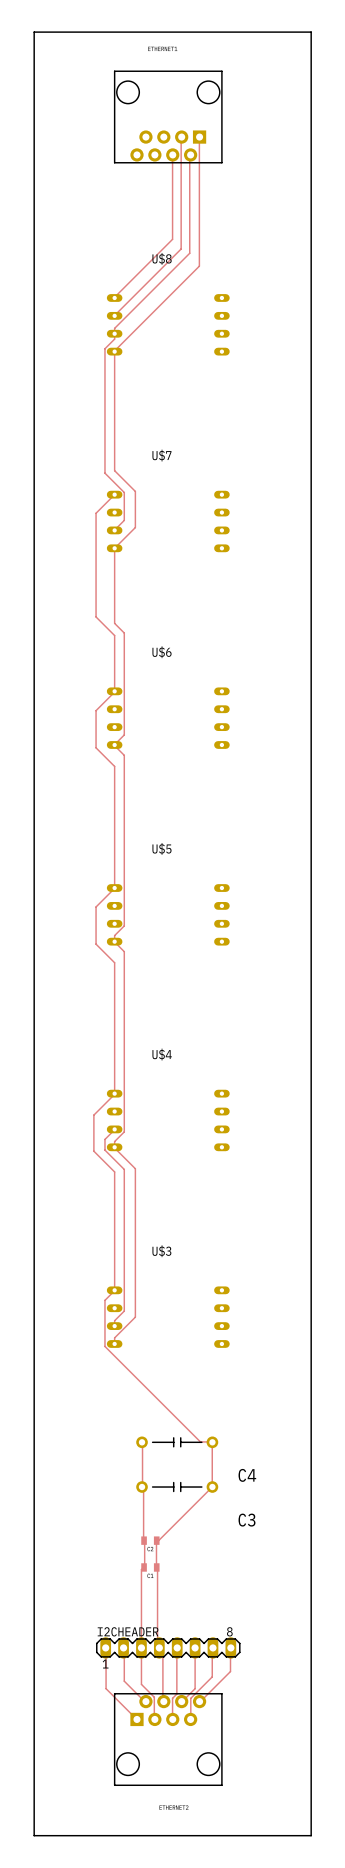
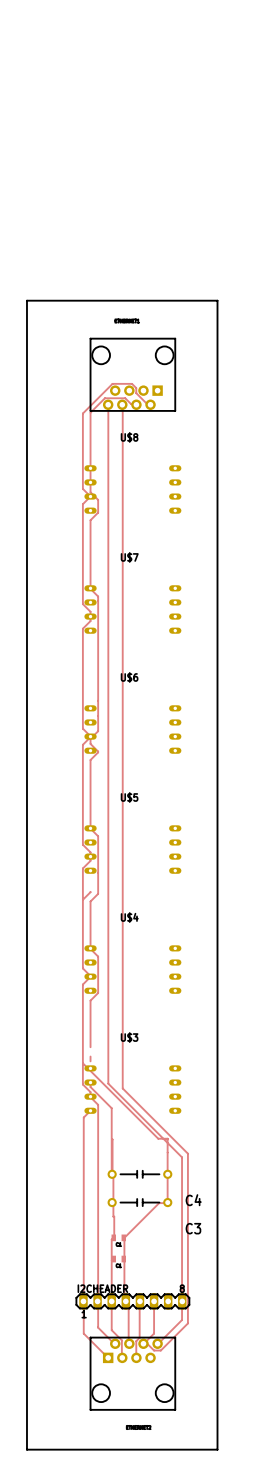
part position: (168, 117) -> (132, 374)
track: (181, 137) (181, 248) (114, 315) -> none
track: (199, 137) (199, 266) (114, 350) (114, 470) (135, 491) (135, 527) (114, 548) -> (90, 418) (90, 433)
track: (172, 154) (172, 239) (114, 297) -> none
track: (190, 154) (189, 253) (114, 328) (114, 339) (104, 348) (104, 473) (124, 492) (124, 520) (114, 530) -> (136, 404) (131, 404) (125, 398) (104, 398) (90, 412) (90, 418)
U$8 position: (168, 324) -> (132, 489)
board edge: (34, 380) (34, 32) (311, 32) (311, 1835) (275, 1835) -> (26, 300) (217, 300) (217, 1449)
track: (114, 494) (96, 513) (96, 616) (114, 635) (114, 658) -> none
track: none -> (108, 404) (108, 1083) (182, 1157) (182, 1301)
track: none -> (122, 404) (122, 1088) (187, 1153) (187, 1323) (160, 1350) (154, 1350) (145, 1342) (143, 1343)
track: none -> (150, 404) (147, 404) (136, 393) (136, 388) (132, 383) (112, 383) (82, 413) (82, 488) (90, 496) (82, 504) (82, 604) (90, 611)
U$7 position: (168, 521) -> (132, 609)
track: (124, 649) (124, 734) (114, 744) -> (98, 512) (90, 520)
track: (114, 692) (96, 710) (96, 747) (114, 766) (114, 774) -> (90, 546) (90, 588)
U$6 position: (168, 718) -> (132, 729)
track: (114, 786) (114, 888) (96, 906) (96, 944) (114, 962) -> (90, 621) (82, 628) (82, 728) (90, 736) (82, 744) (82, 844) (90, 852)
U$5 position: (168, 914) -> (132, 849)
track: (124, 952) (124, 1058) -> (98, 752) (90, 760)
track: (114, 1049) (114, 1079) -> (90, 828) (98, 836)
track: (114, 1090) (114, 1094) (93, 1115) (93, 1151) (114, 1171) -> (90, 860) (82, 868) (82, 899)
U$4 position: (168, 1120) -> (132, 969)
track: (114, 1148) (135, 1168) (135, 1317) (114, 1337) -> (90, 906) (90, 925)
track: (104, 1150) (124, 1169) (124, 1211) -> (82, 908) (82, 968) (90, 976)
track: (114, 1201) (114, 1235) -> (90, 948) (98, 956)
track: (114, 1237) (114, 1267) -> (98, 993) (90, 1000)
track: none -> (90, 976) (82, 984) (82, 1026)
track: (124, 1257) (124, 1311) (114, 1320) -> none
track: (114, 1290) (104, 1300) -> (90, 1019) (90, 1042)
U$3 position: (168, 1317) -> (132, 1089)
track: none -> (82, 1063) (82, 1084) (90, 1092) (90, 1097) (98, 1104) (98, 1301)
track: none -> (90, 1082) (90, 1087) (111, 1108) (112, 1174)
track: none -> (90, 1110) (83, 1117) (83, 1301)
C4: (177, 1442) -> none
track: (212, 1487) (156, 1540) (156, 1567) -> (167, 1174) (167, 1203) (159, 1203) (124, 1237)
C3 name: C3 (247, 1520) -> C4 (193, 1200)
C3: none -> (139, 1202)
part: (150, 1540) -> none
part: none -> (118, 1259)
track: (212, 1647) (212, 1676) (190, 1698) (190, 1719) -> none

